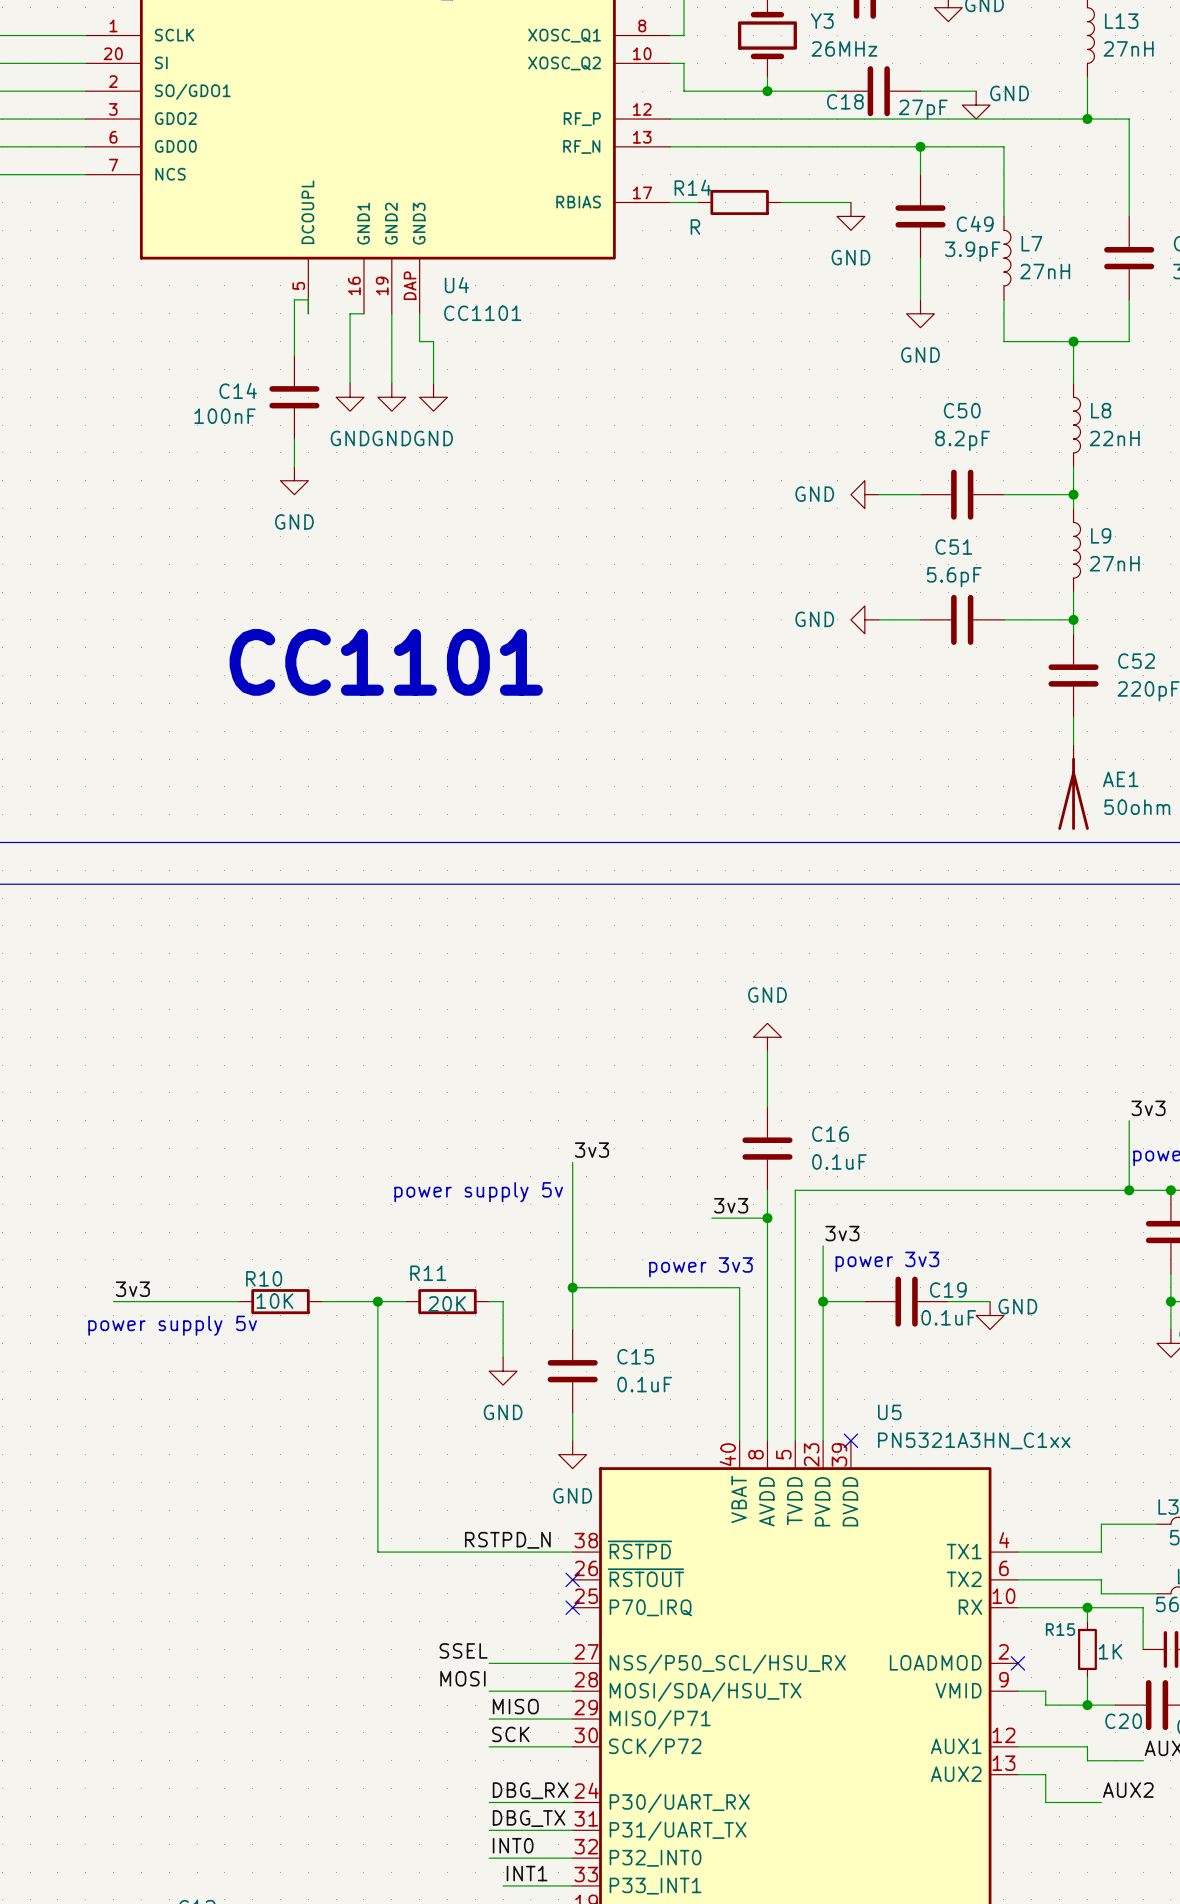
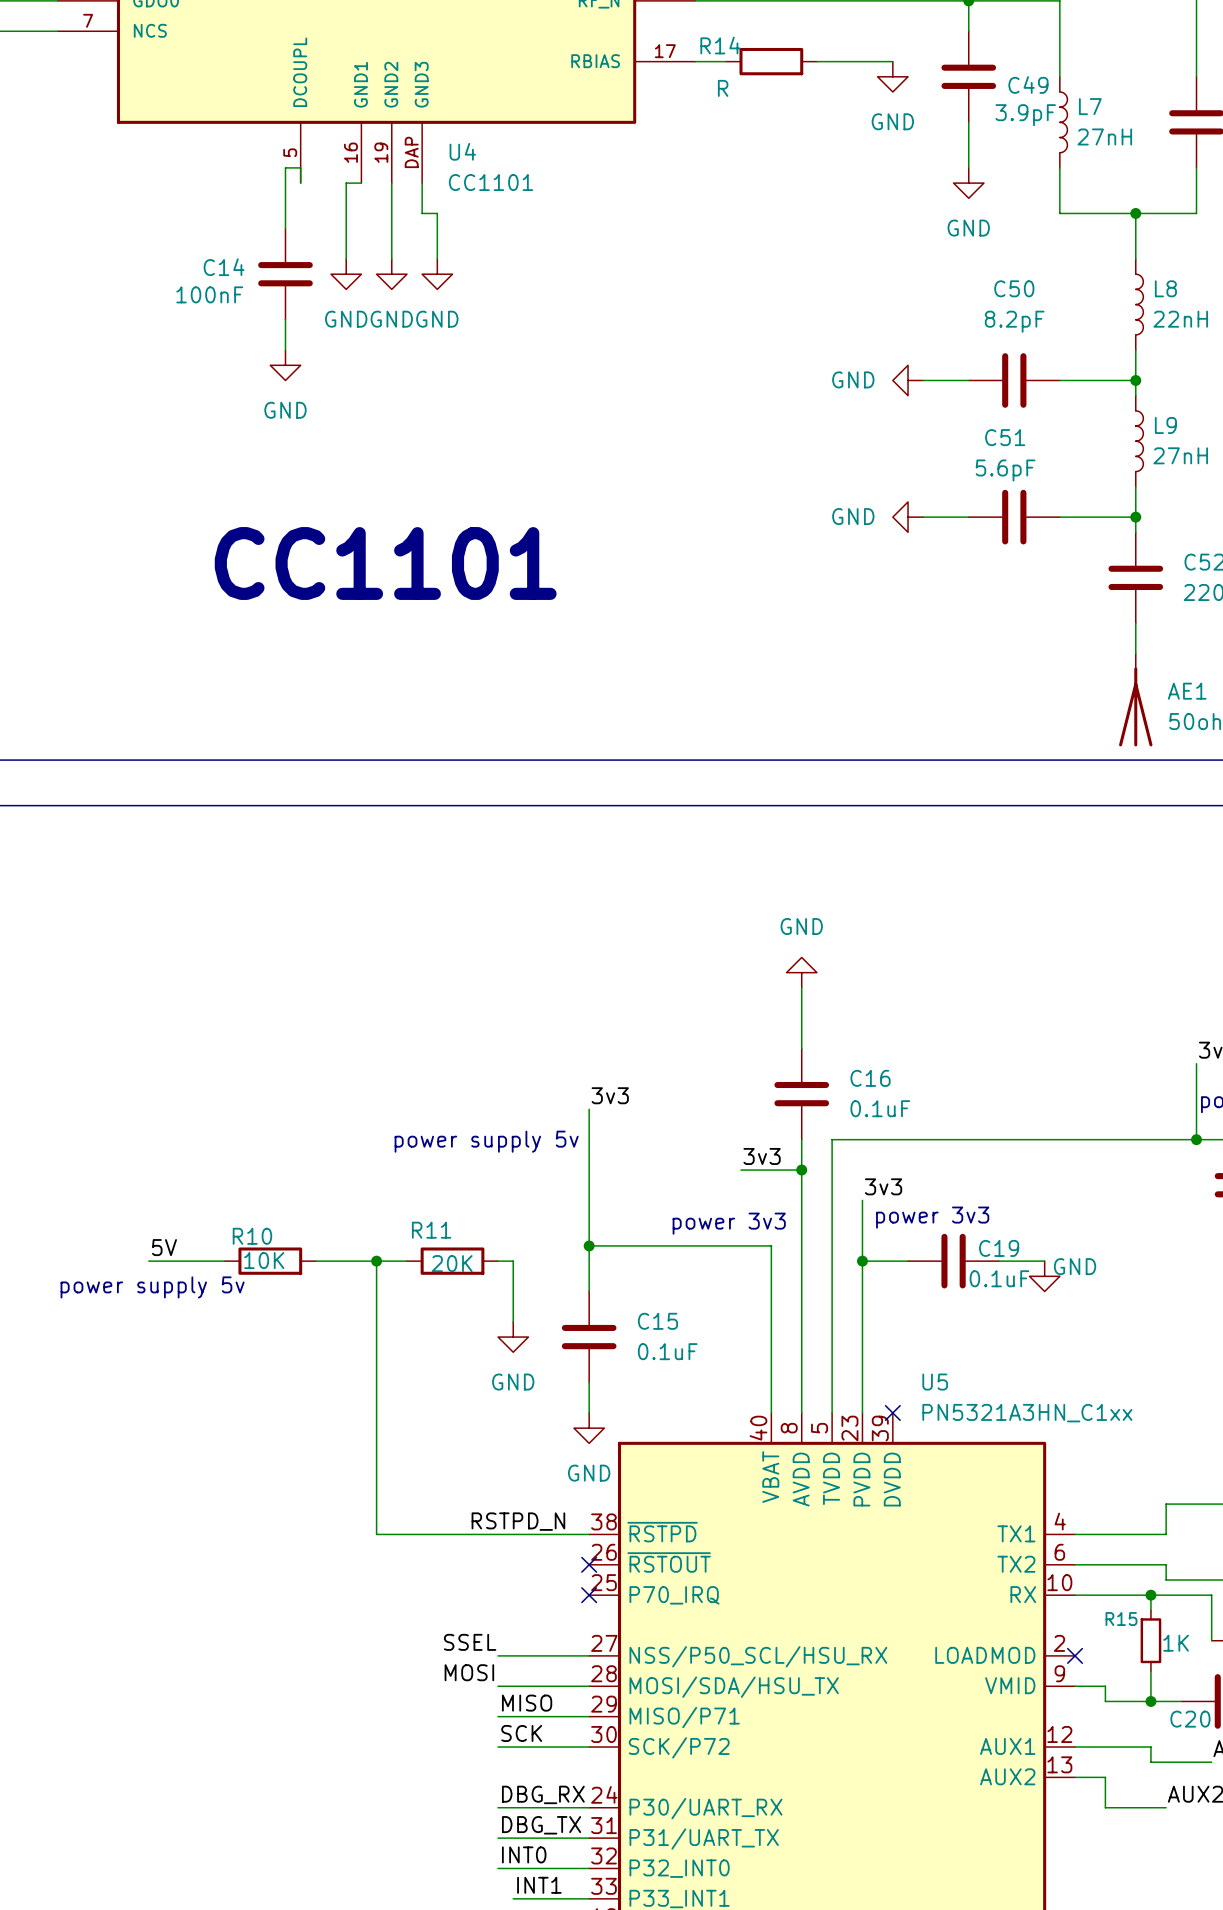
label: 3v3 (132, 1289) -> none
label: none -> 5V (164, 1247)
wire: (113, 1301) (169, 1301) -> none

